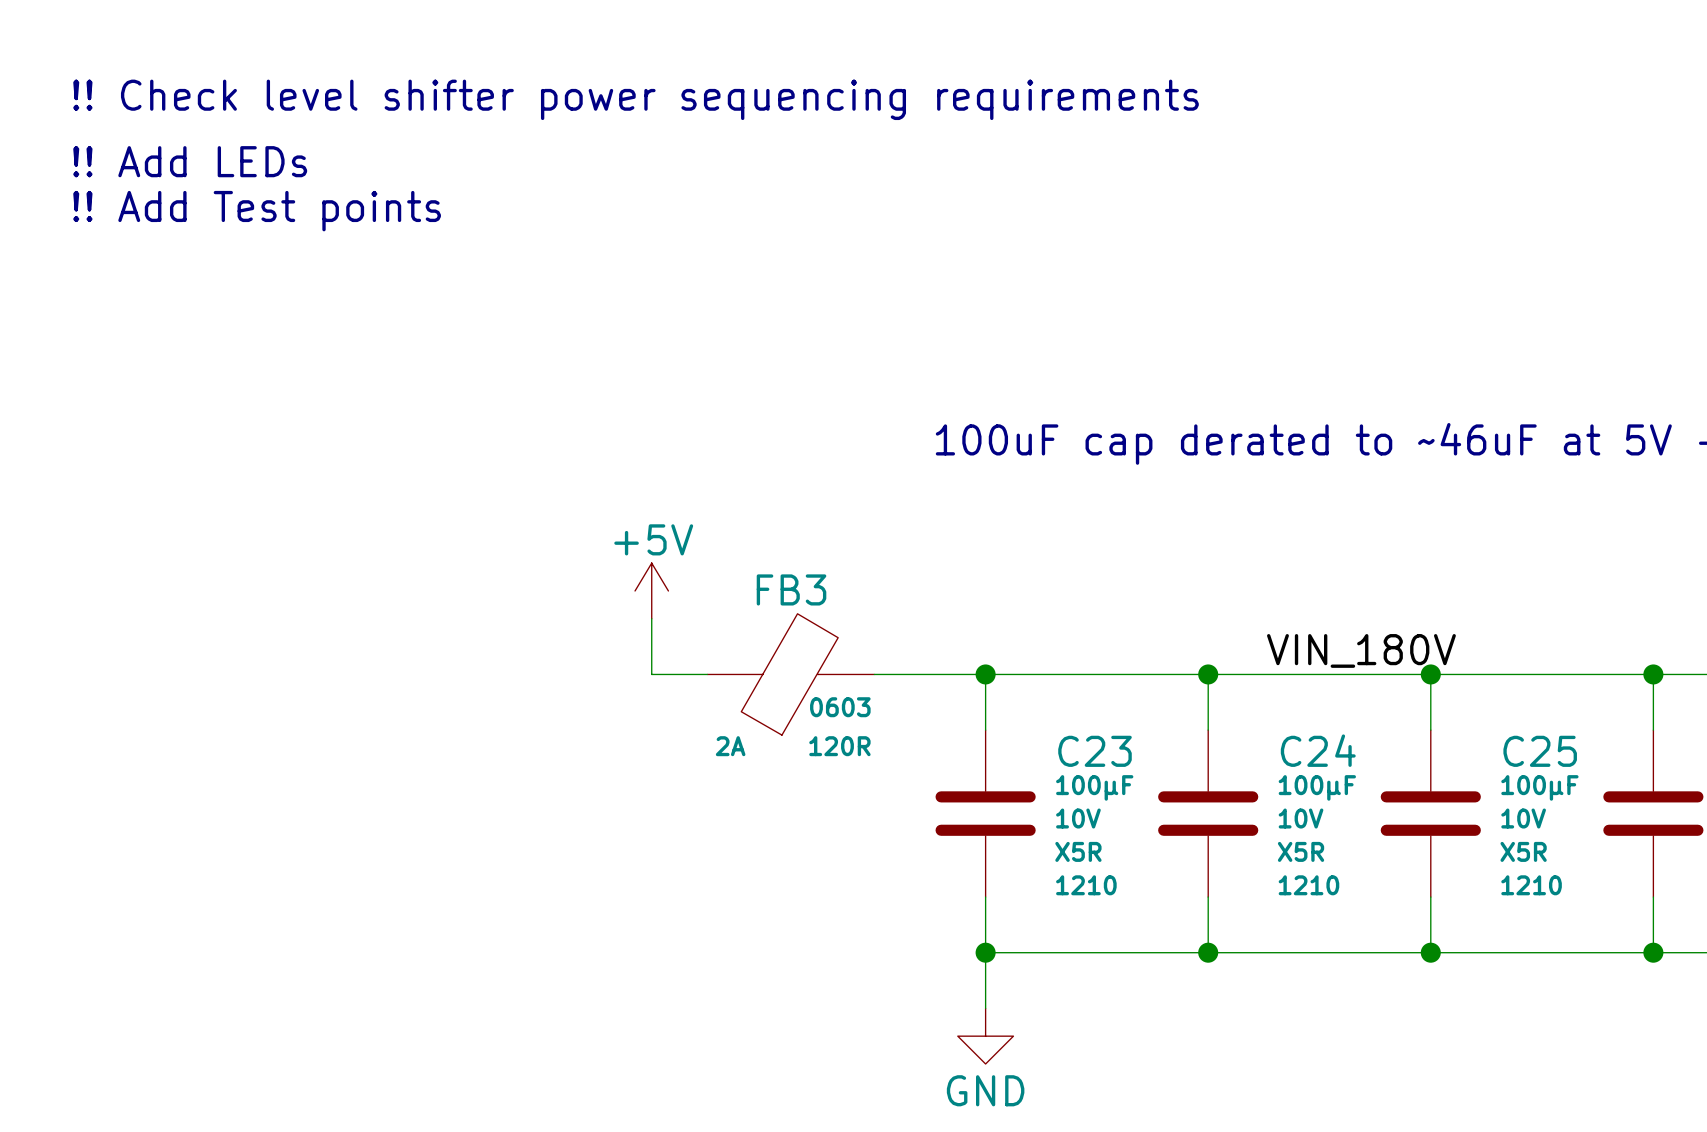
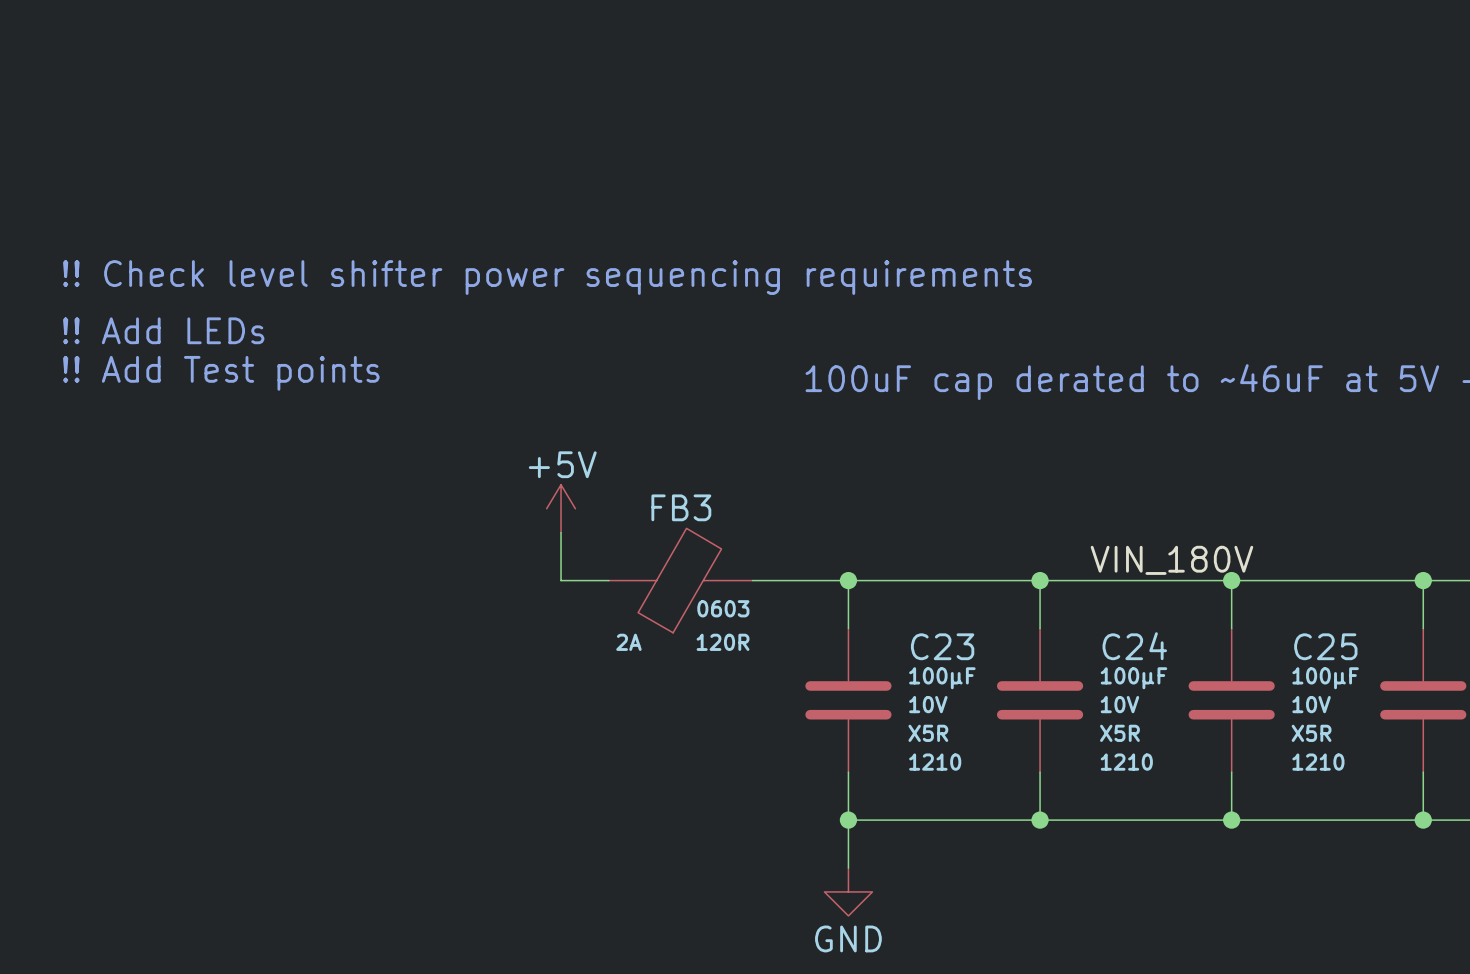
text position: !! Check level shifter power sequencing requirements (636, 99) -> !! Check level shifter power sequencing requirements (547, 277)
text position: !! Add LEDs (190, 161) -> !! Add LEDs (163, 330)
text position: !! Add Test points (257, 211) -> !! Add Test points (221, 373)

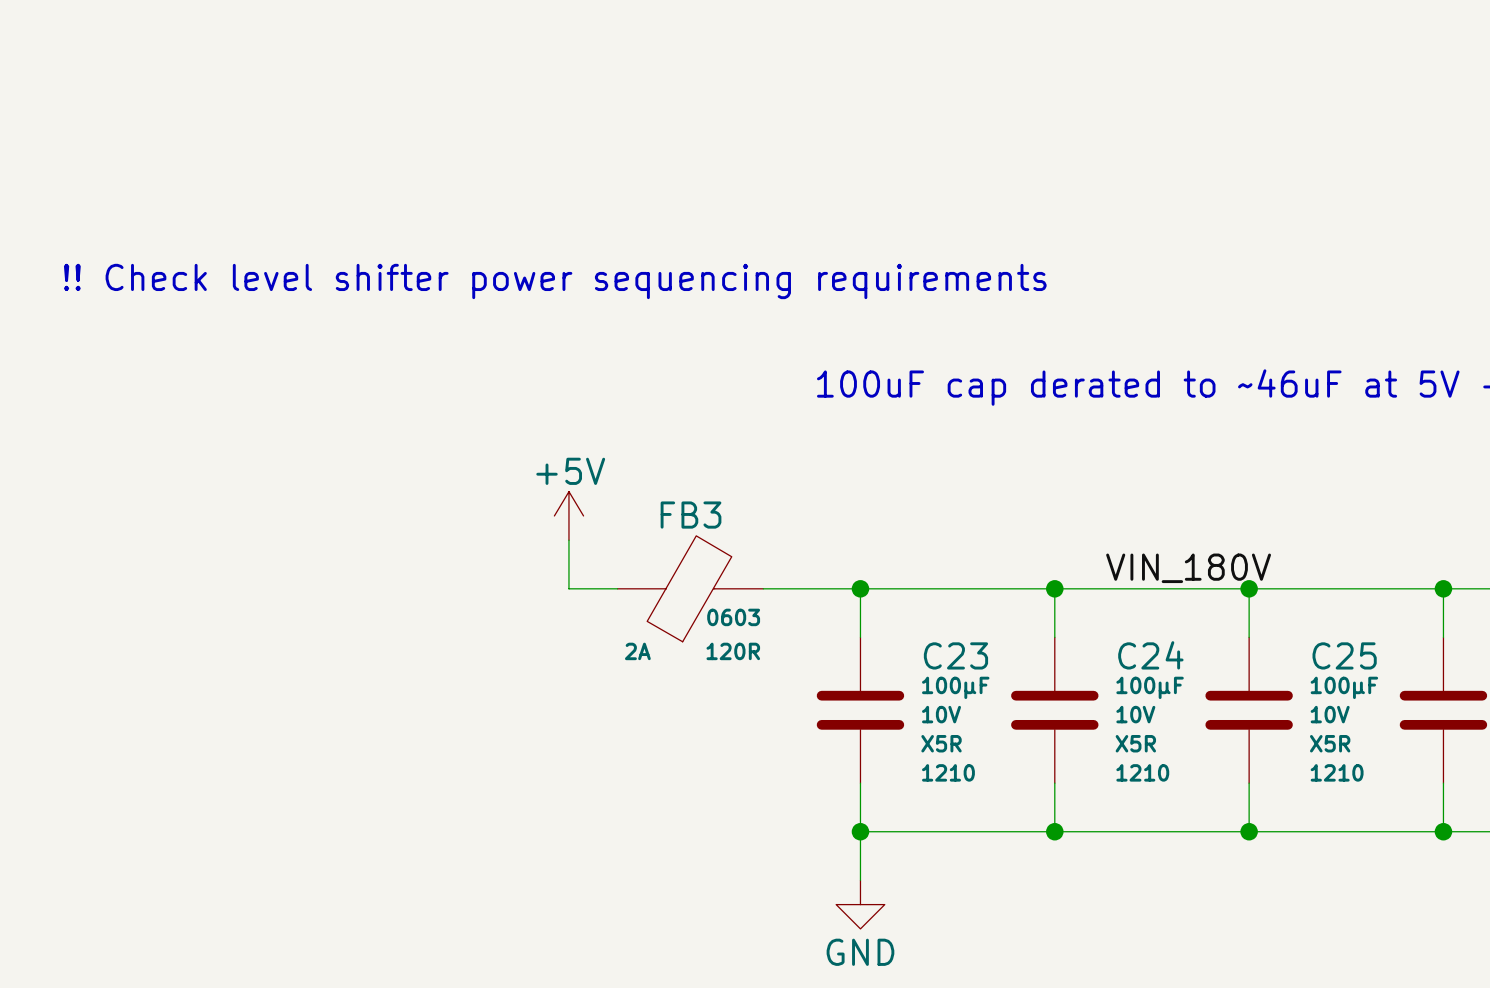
text: !! Add LEDs (163, 330) -> none
text: !! Add Test points (221, 373) -> none

